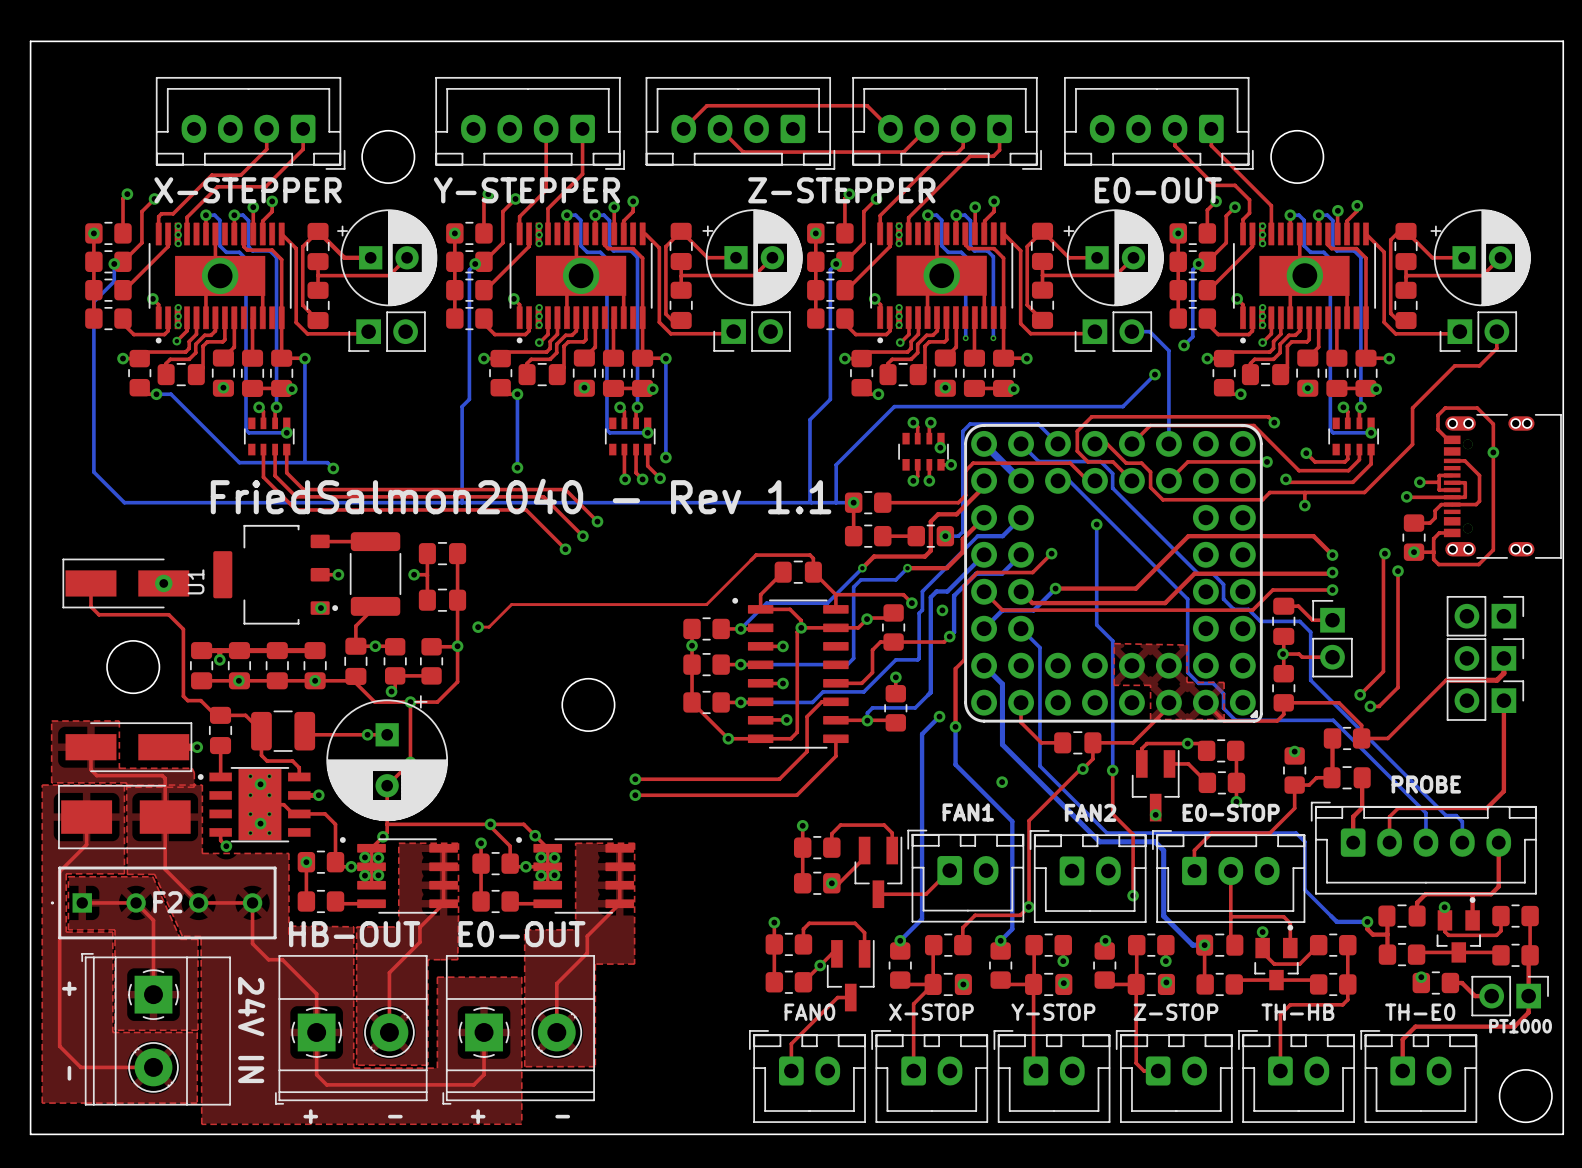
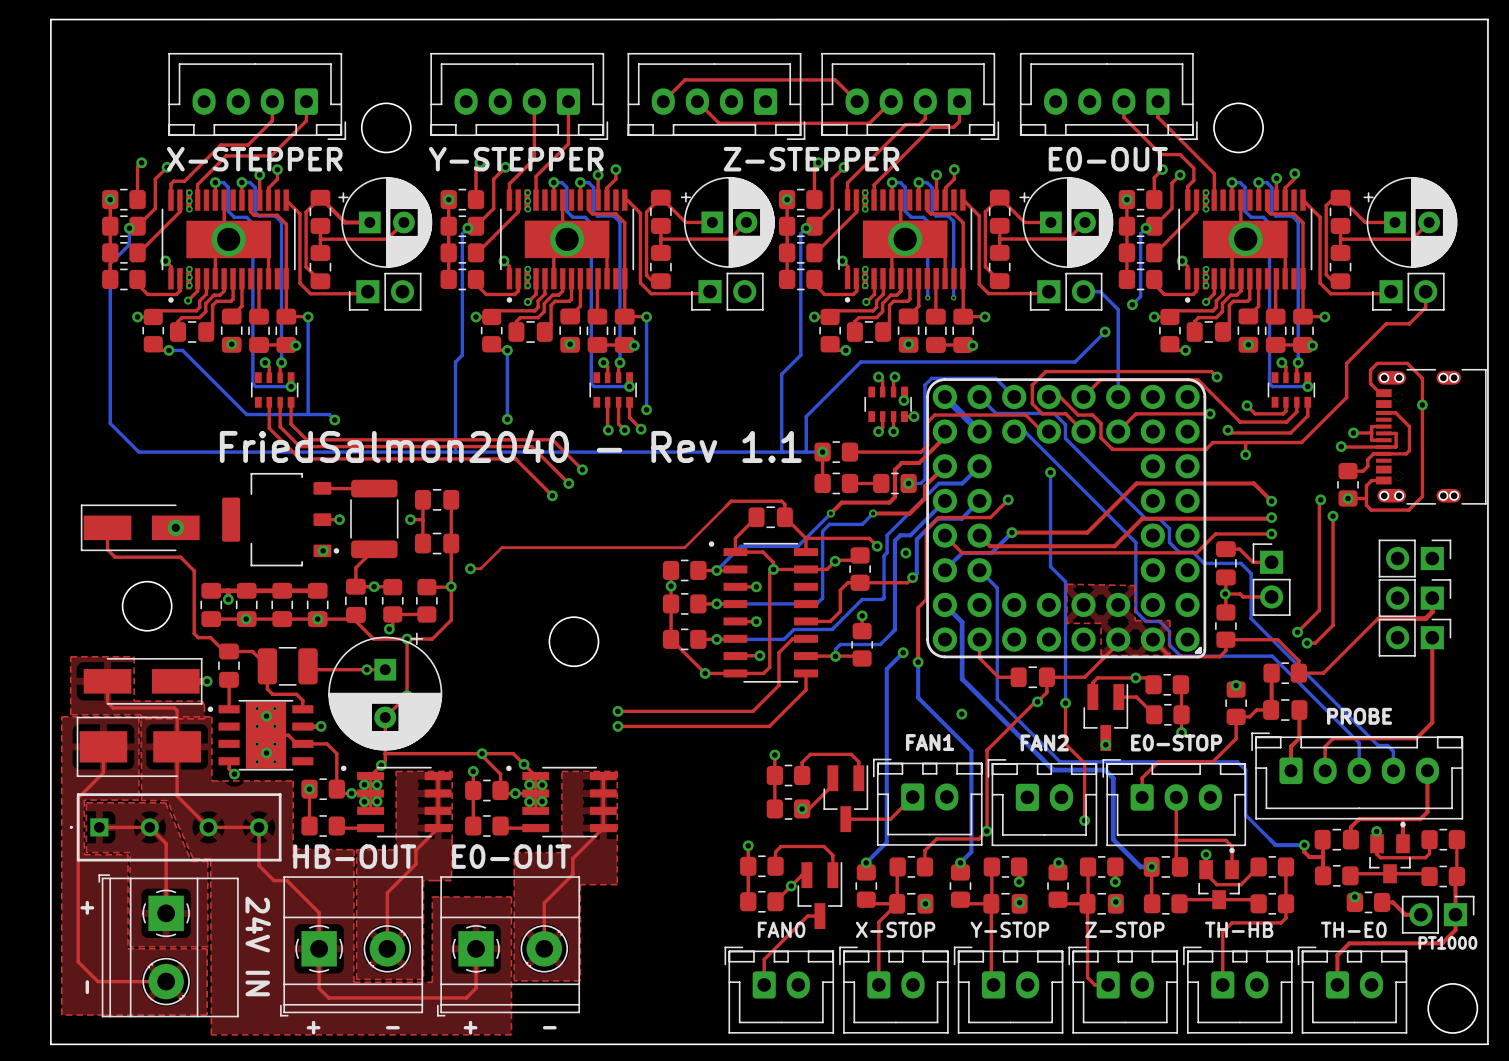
U1 name: U1 (196, 581) -> none
F2 name: F2 (167, 902) -> none

